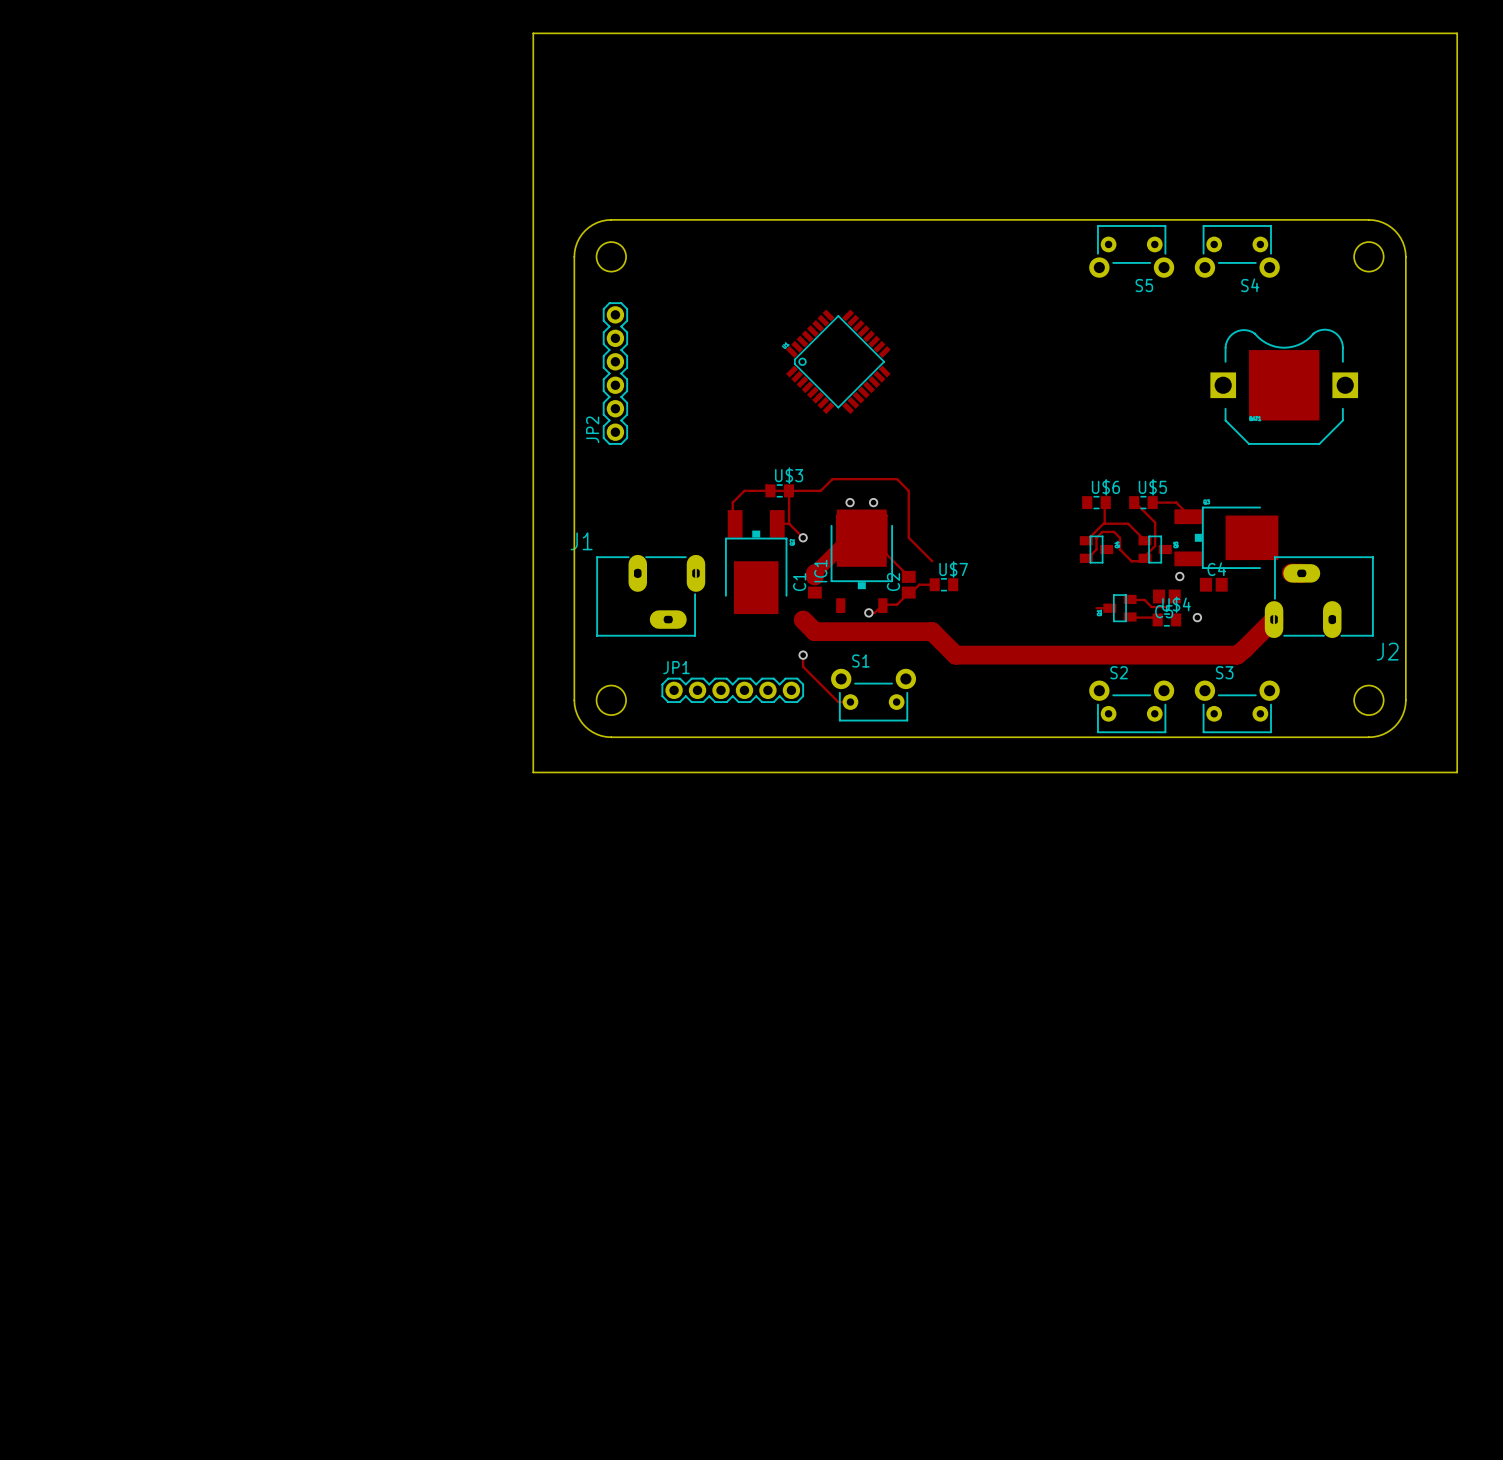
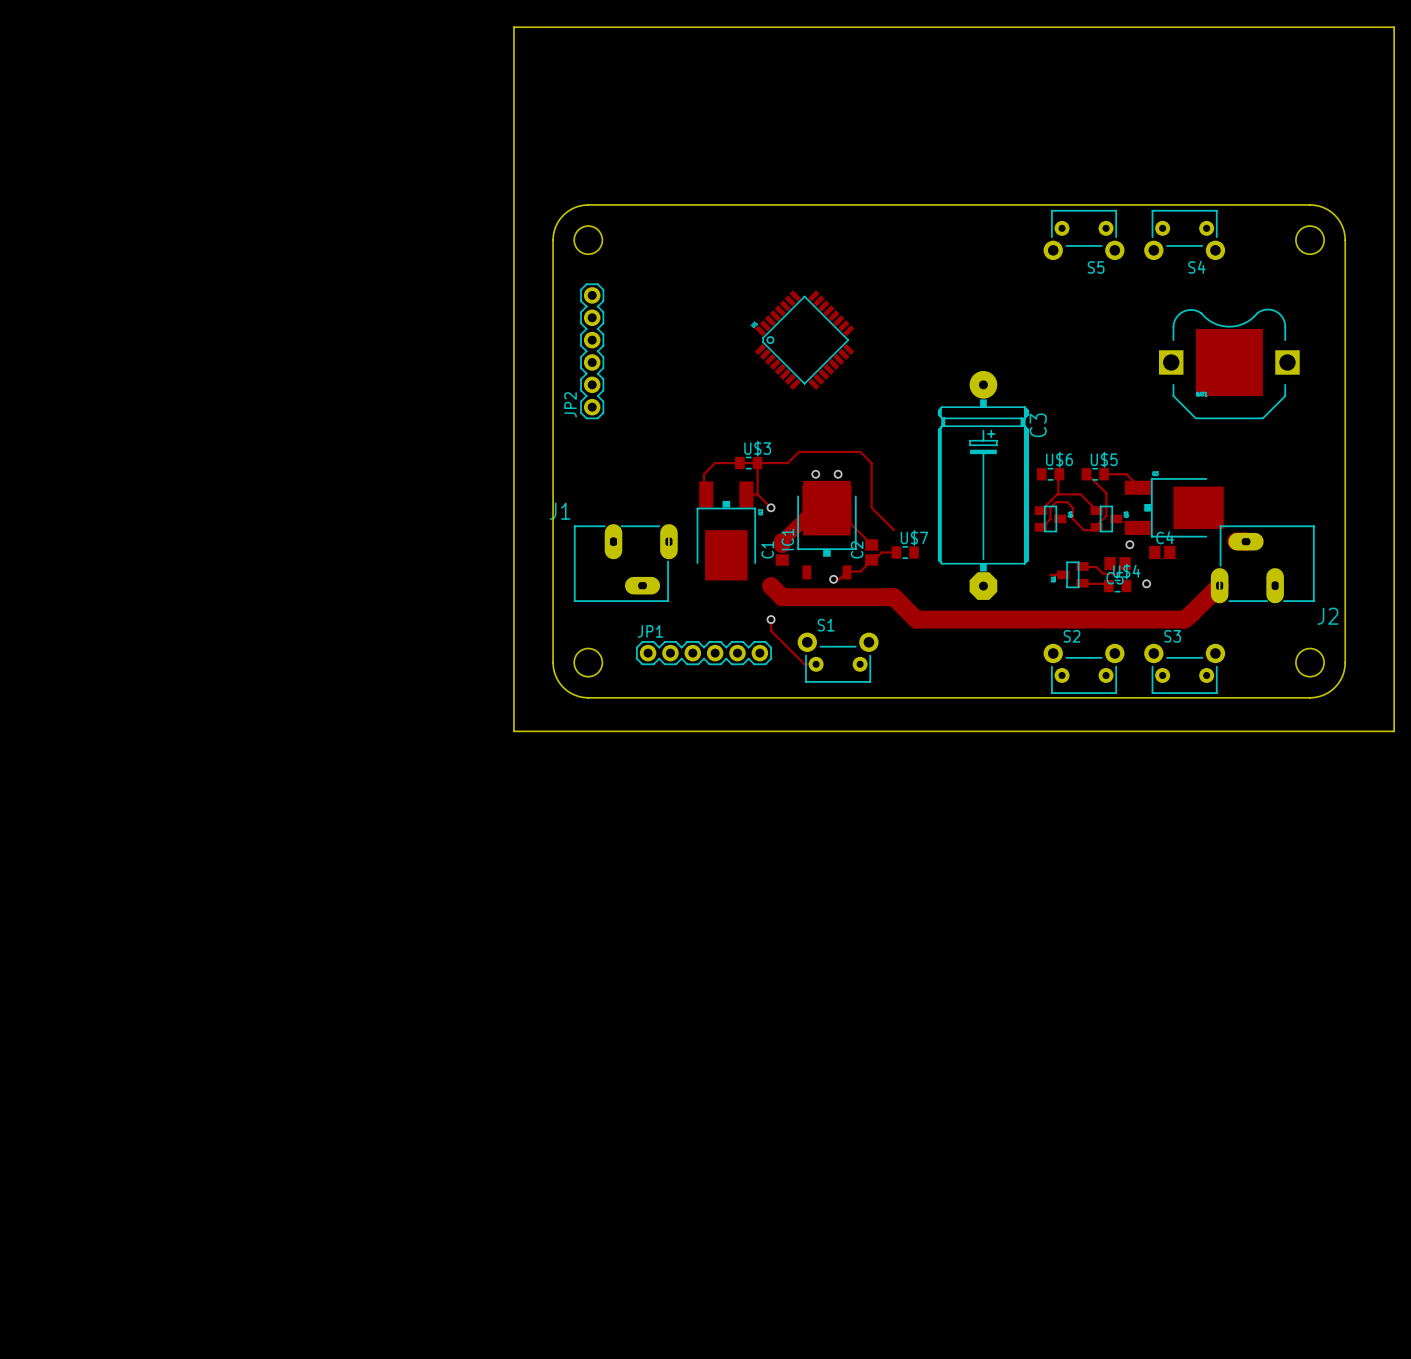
C3: none -> (983, 485)

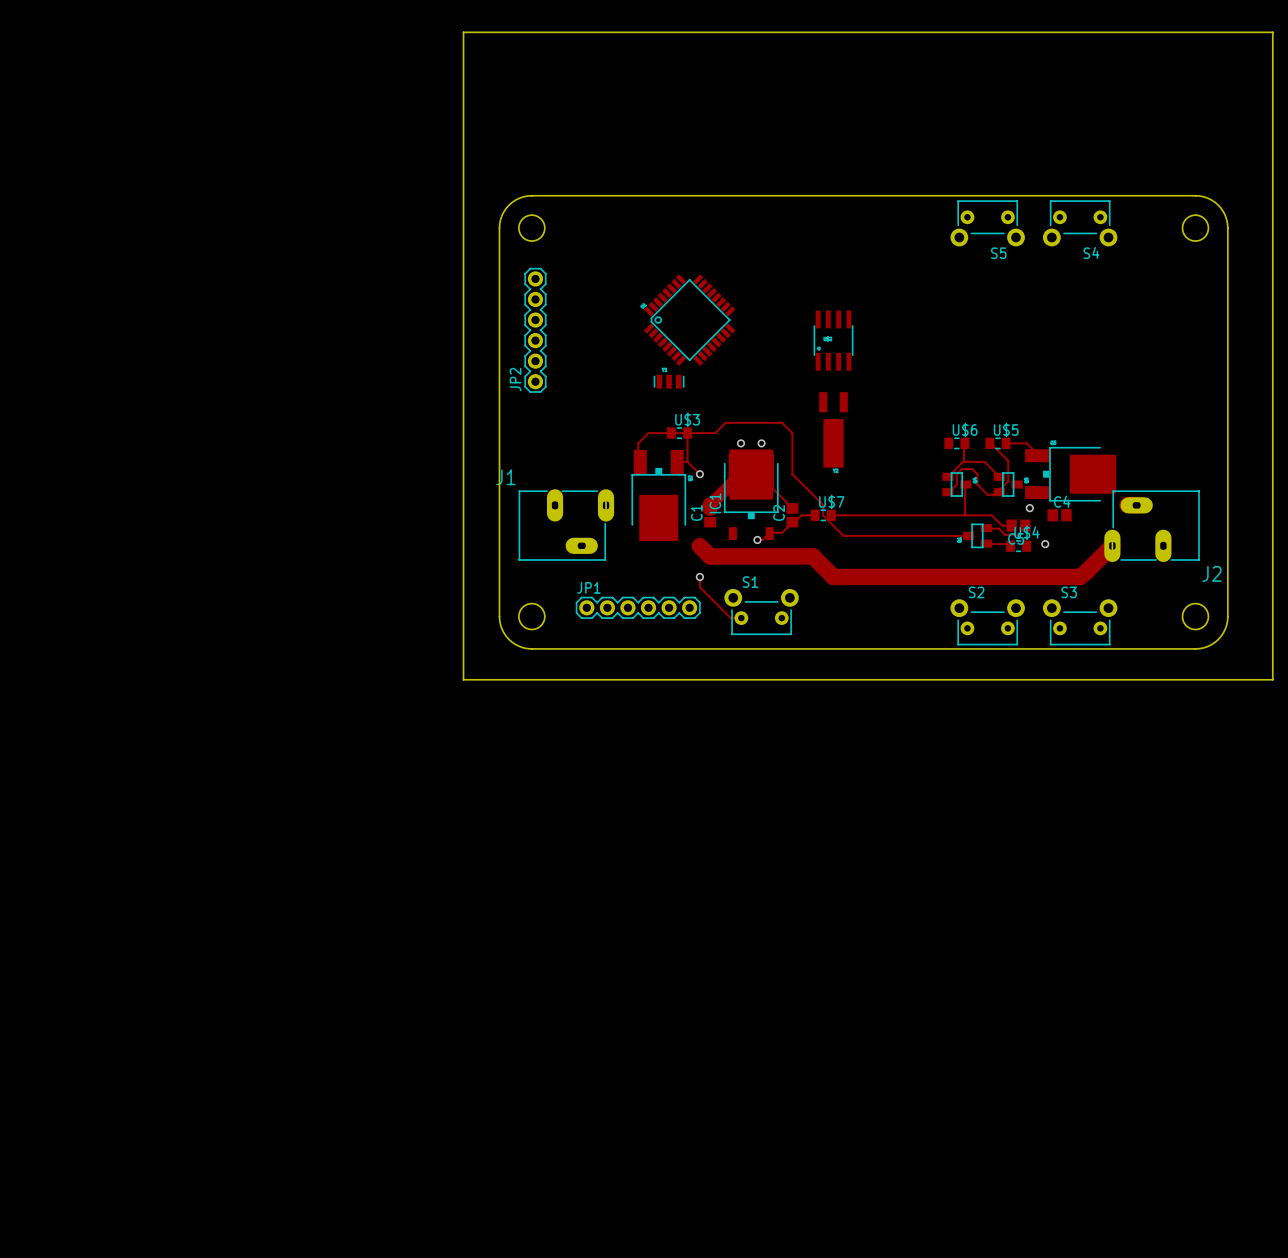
part position: (804, 340) -> (689, 320)
part: none -> (833, 340)
part: (1229, 363) -> none
part: none -> (669, 381)
part: none -> (833, 429)
C3: (983, 485) -> none
track: none -> (965, 484) (965, 515)
track: none -> (812, 494) (823, 505) (823, 515) (843, 535) (956, 535)
track: none -> (831, 515) (991, 515) (1002, 525) (1011, 525)

